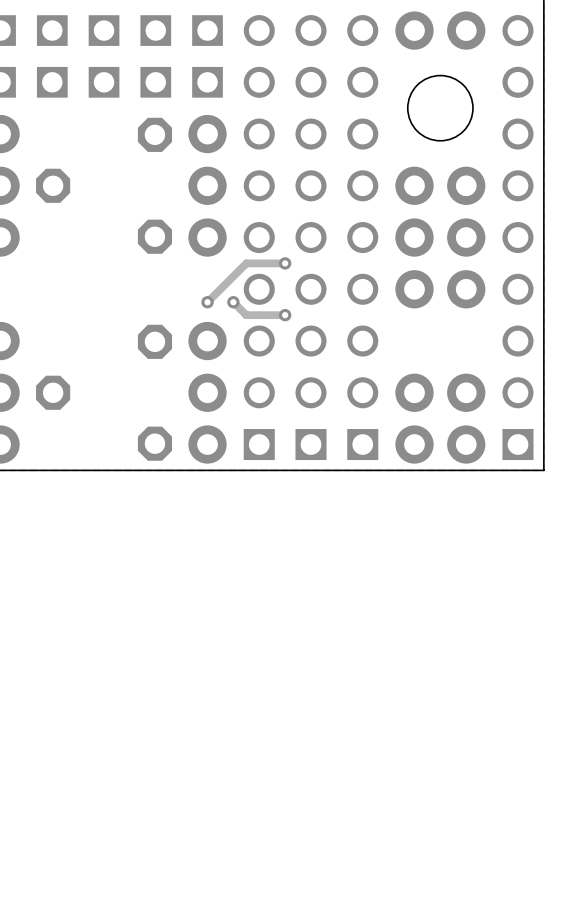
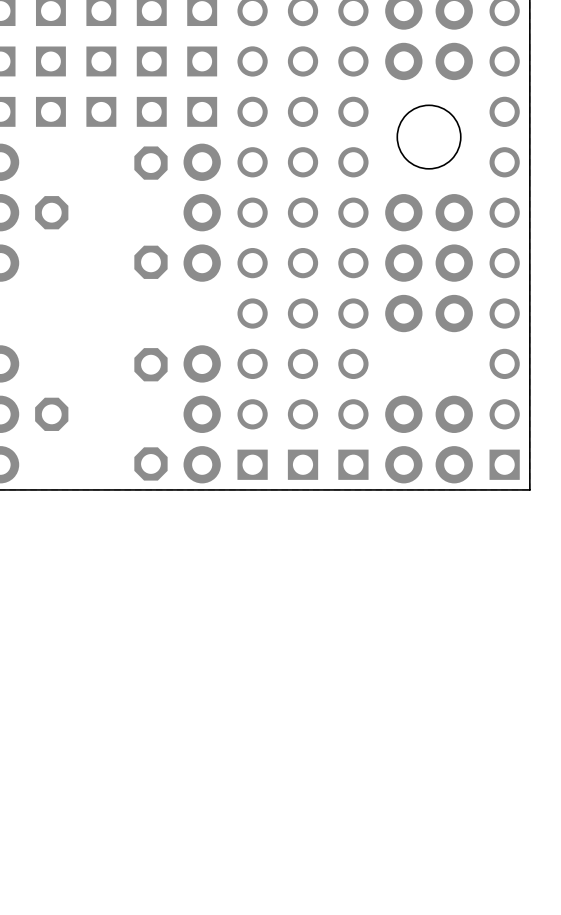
track: (285, 263) (246, 263) (207, 302) -> none
via: (285, 263) -> none
via: (207, 302) -> none
track: (233, 302) (246, 315) (285, 315) -> none
via: (233, 302) -> none
via: (285, 315) -> none

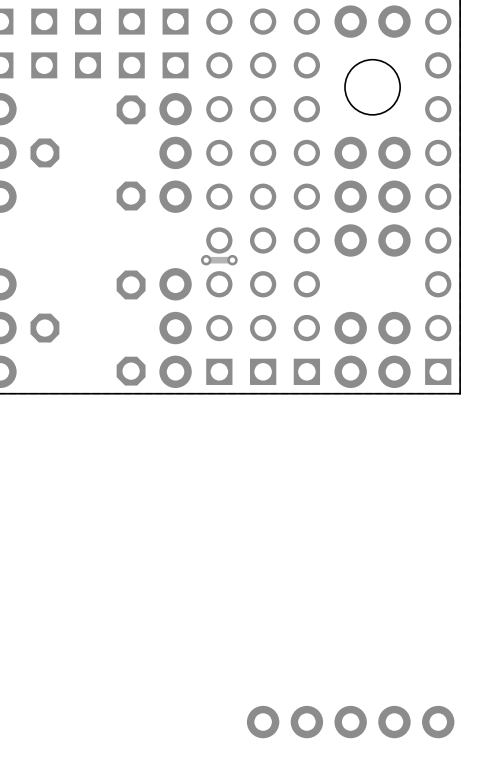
via: none -> (206, 260)
track: none -> (232, 260) (206, 260)
via: none -> (232, 260)
part: none -> (350, 722)

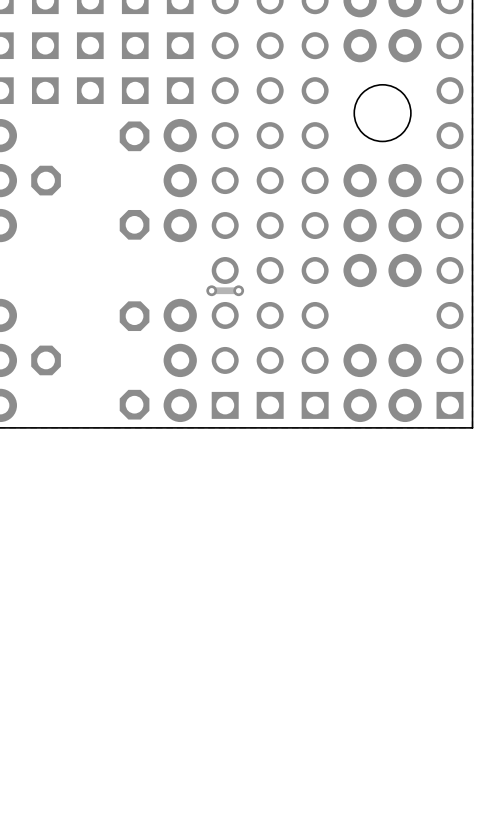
part: (350, 722) -> none

